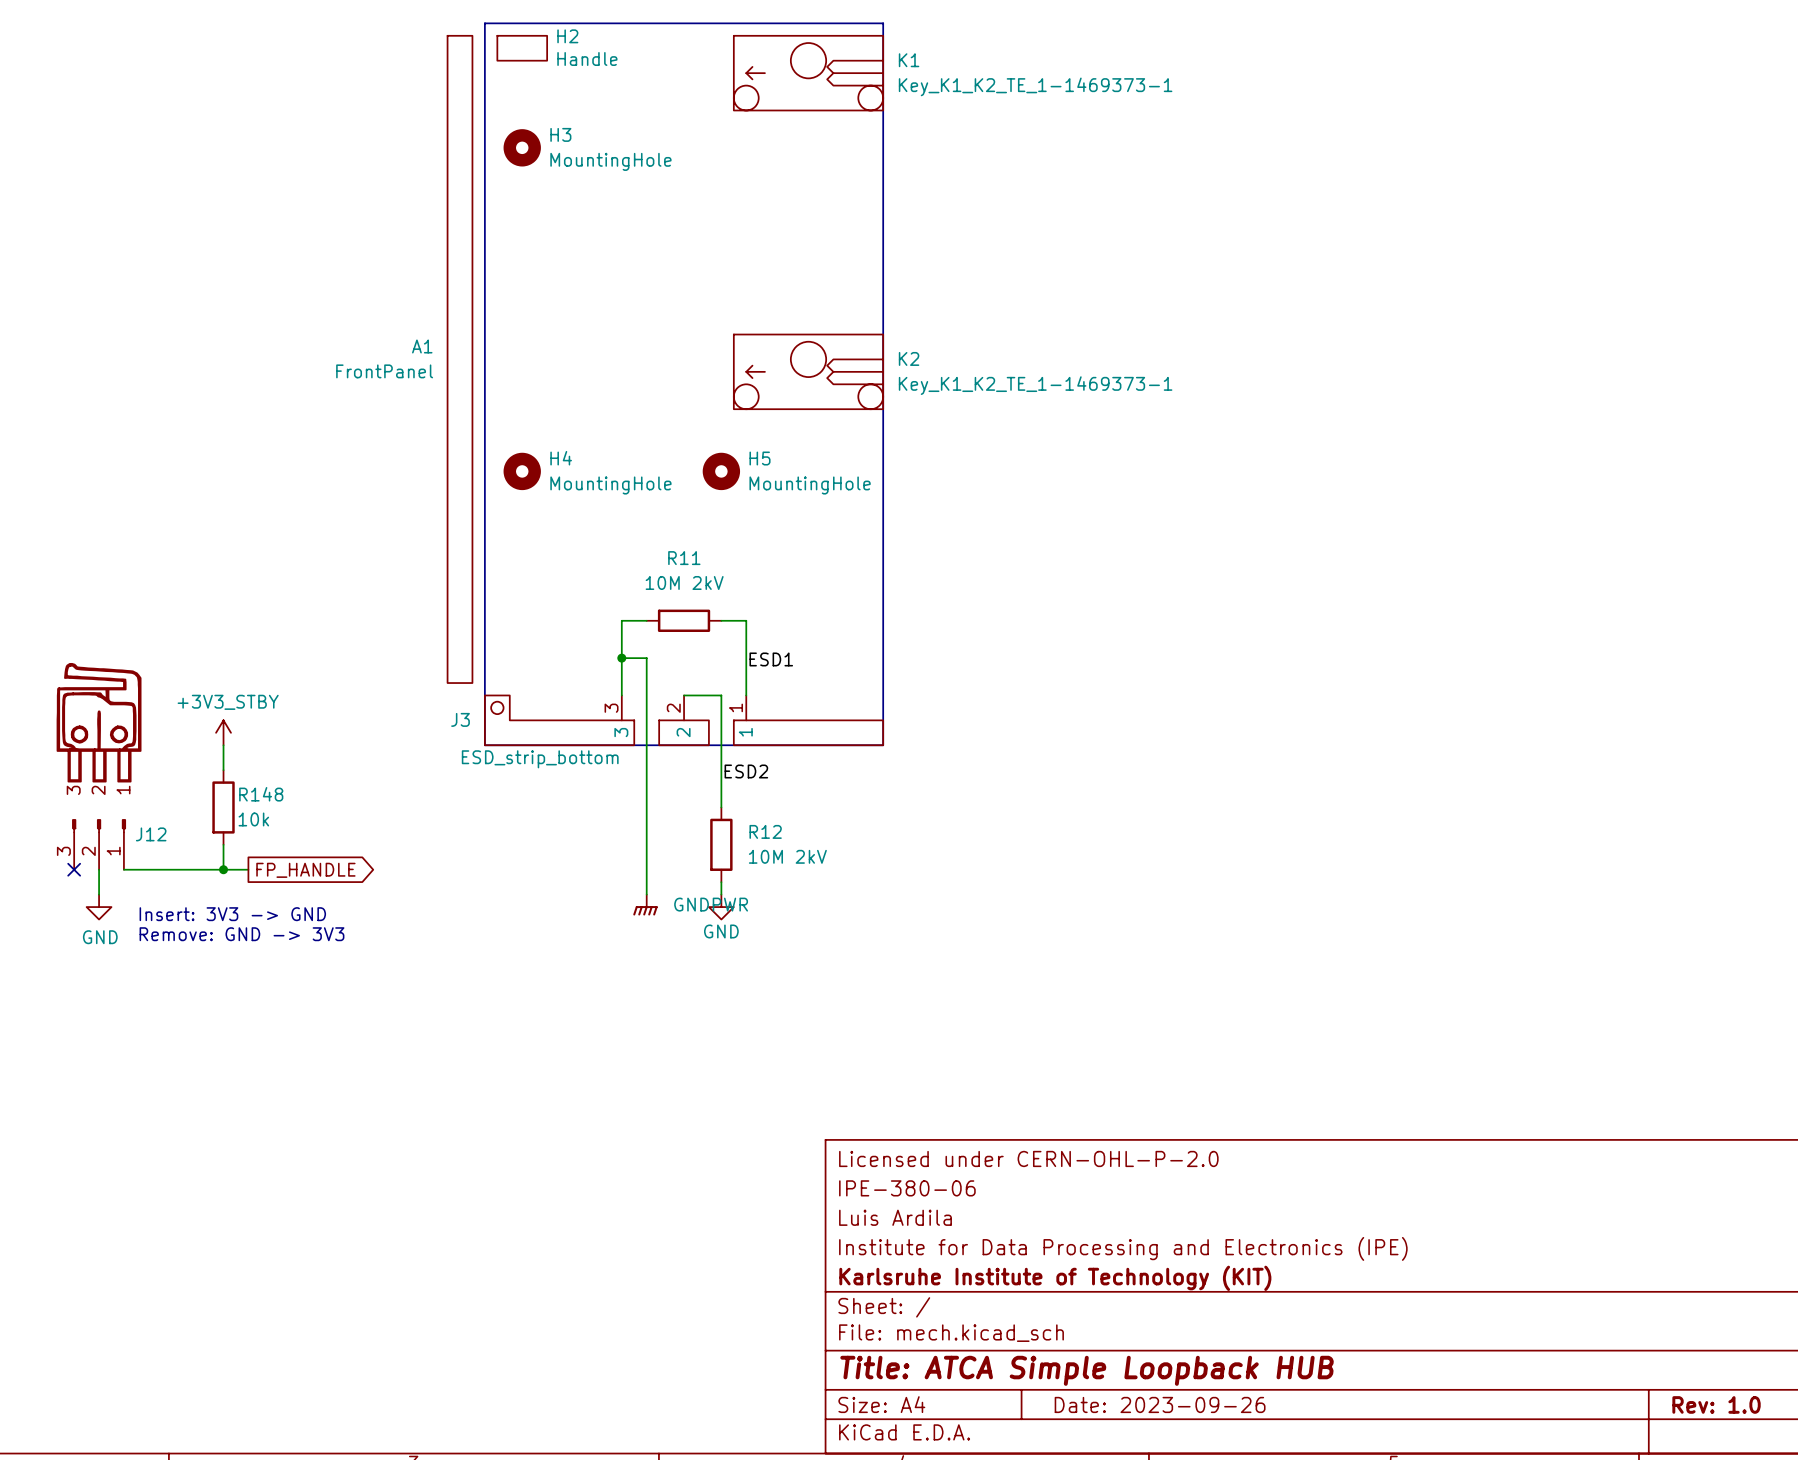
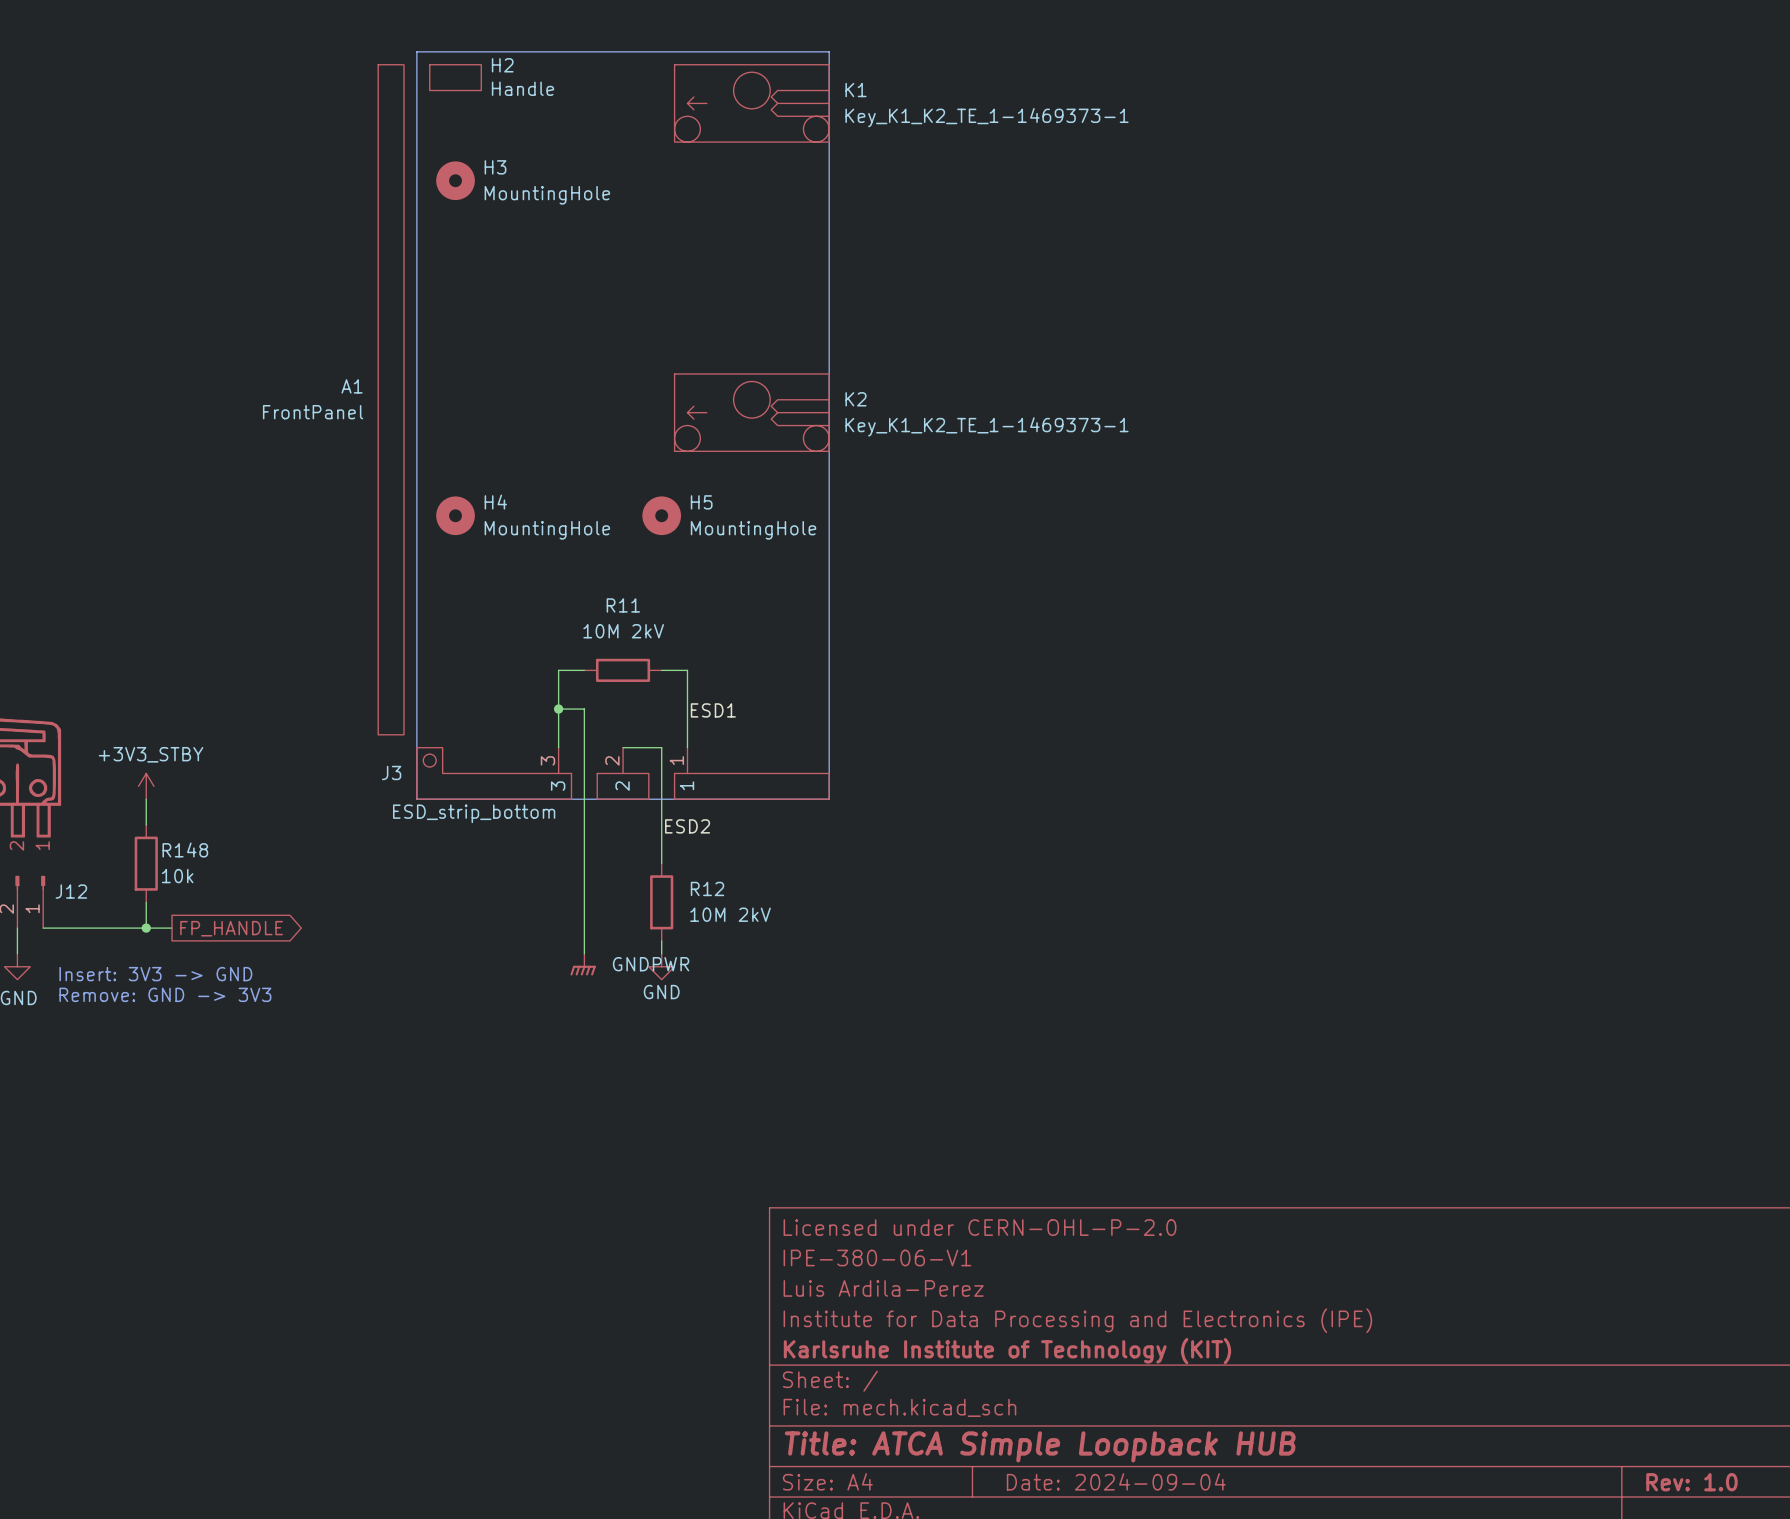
title block: IPE-380-06 (907, 1188) -> IPE-380-06-V1 (877, 1257)
title block: Luis Ardila (895, 1217) -> Luis Ardila-Perez (883, 1288)
title block: Date: 2023-09-26 (1160, 1404) -> Date: 2024-09-04 (1116, 1481)

